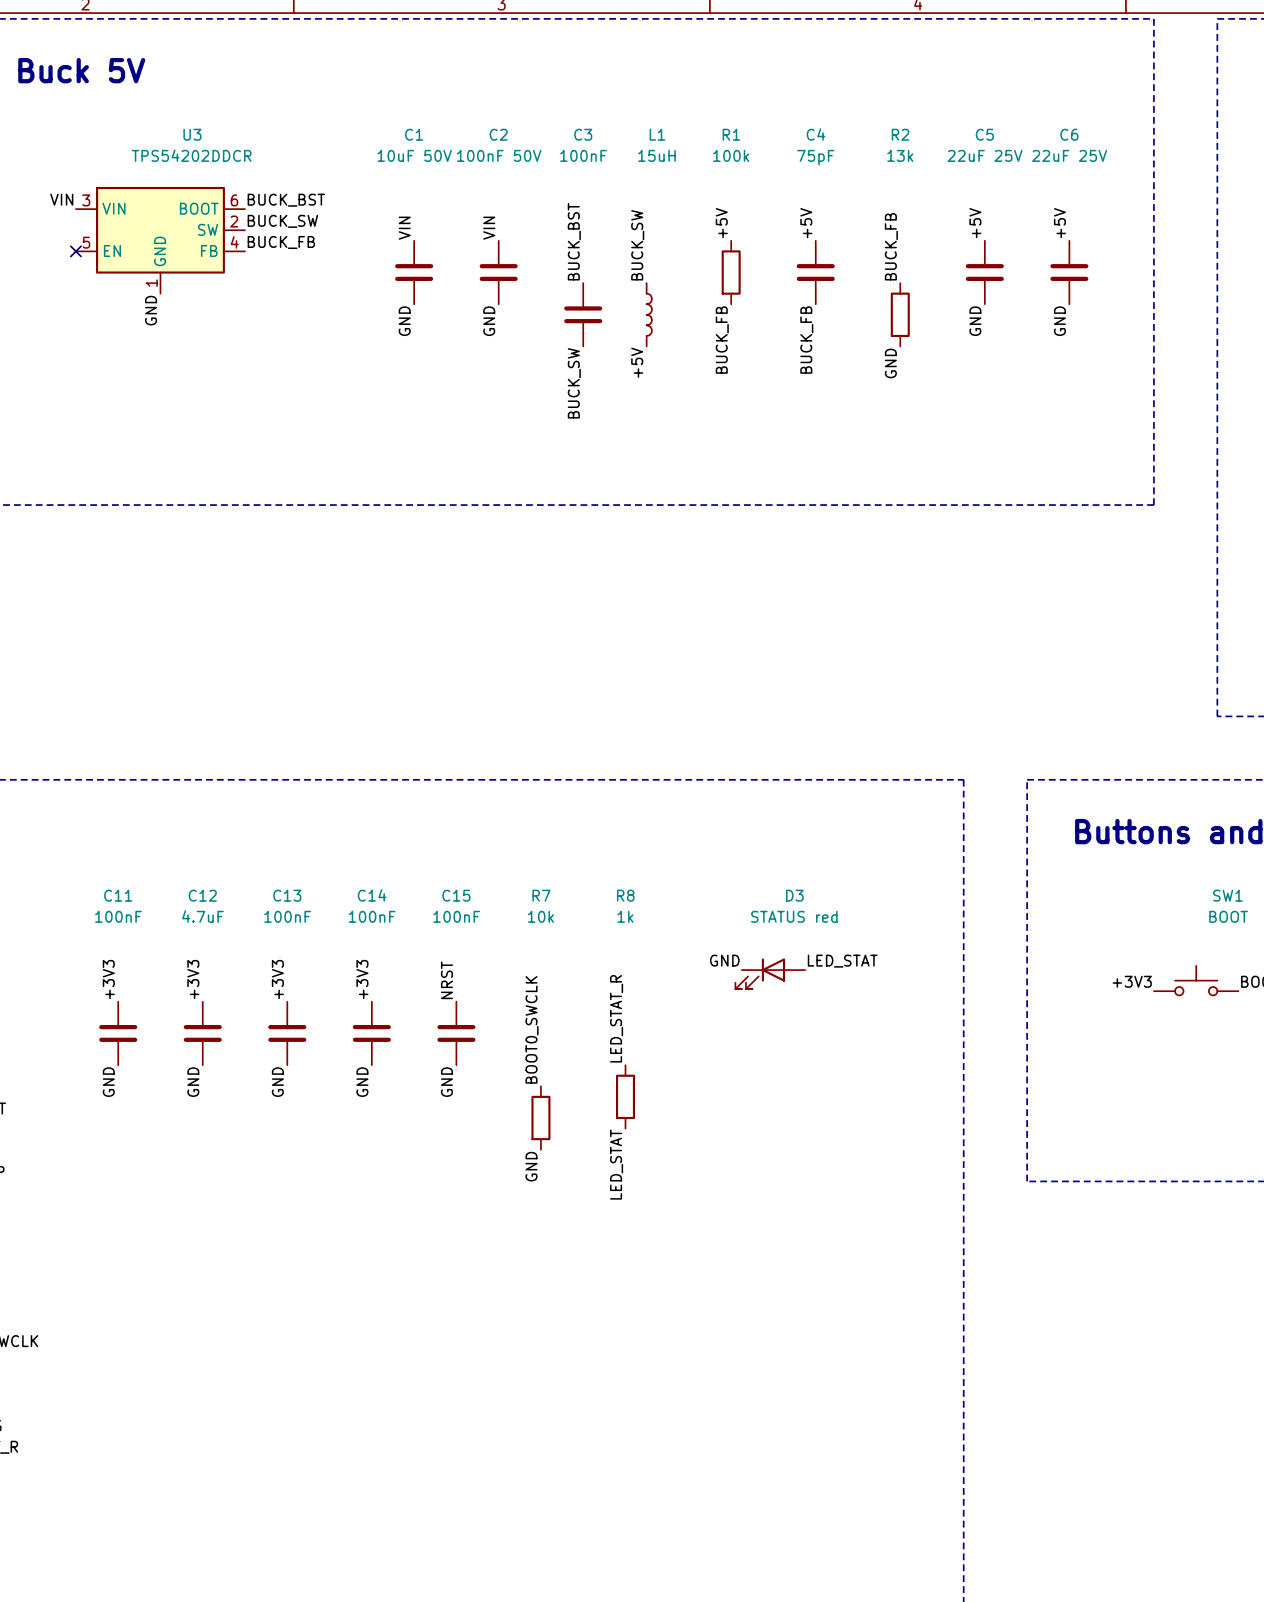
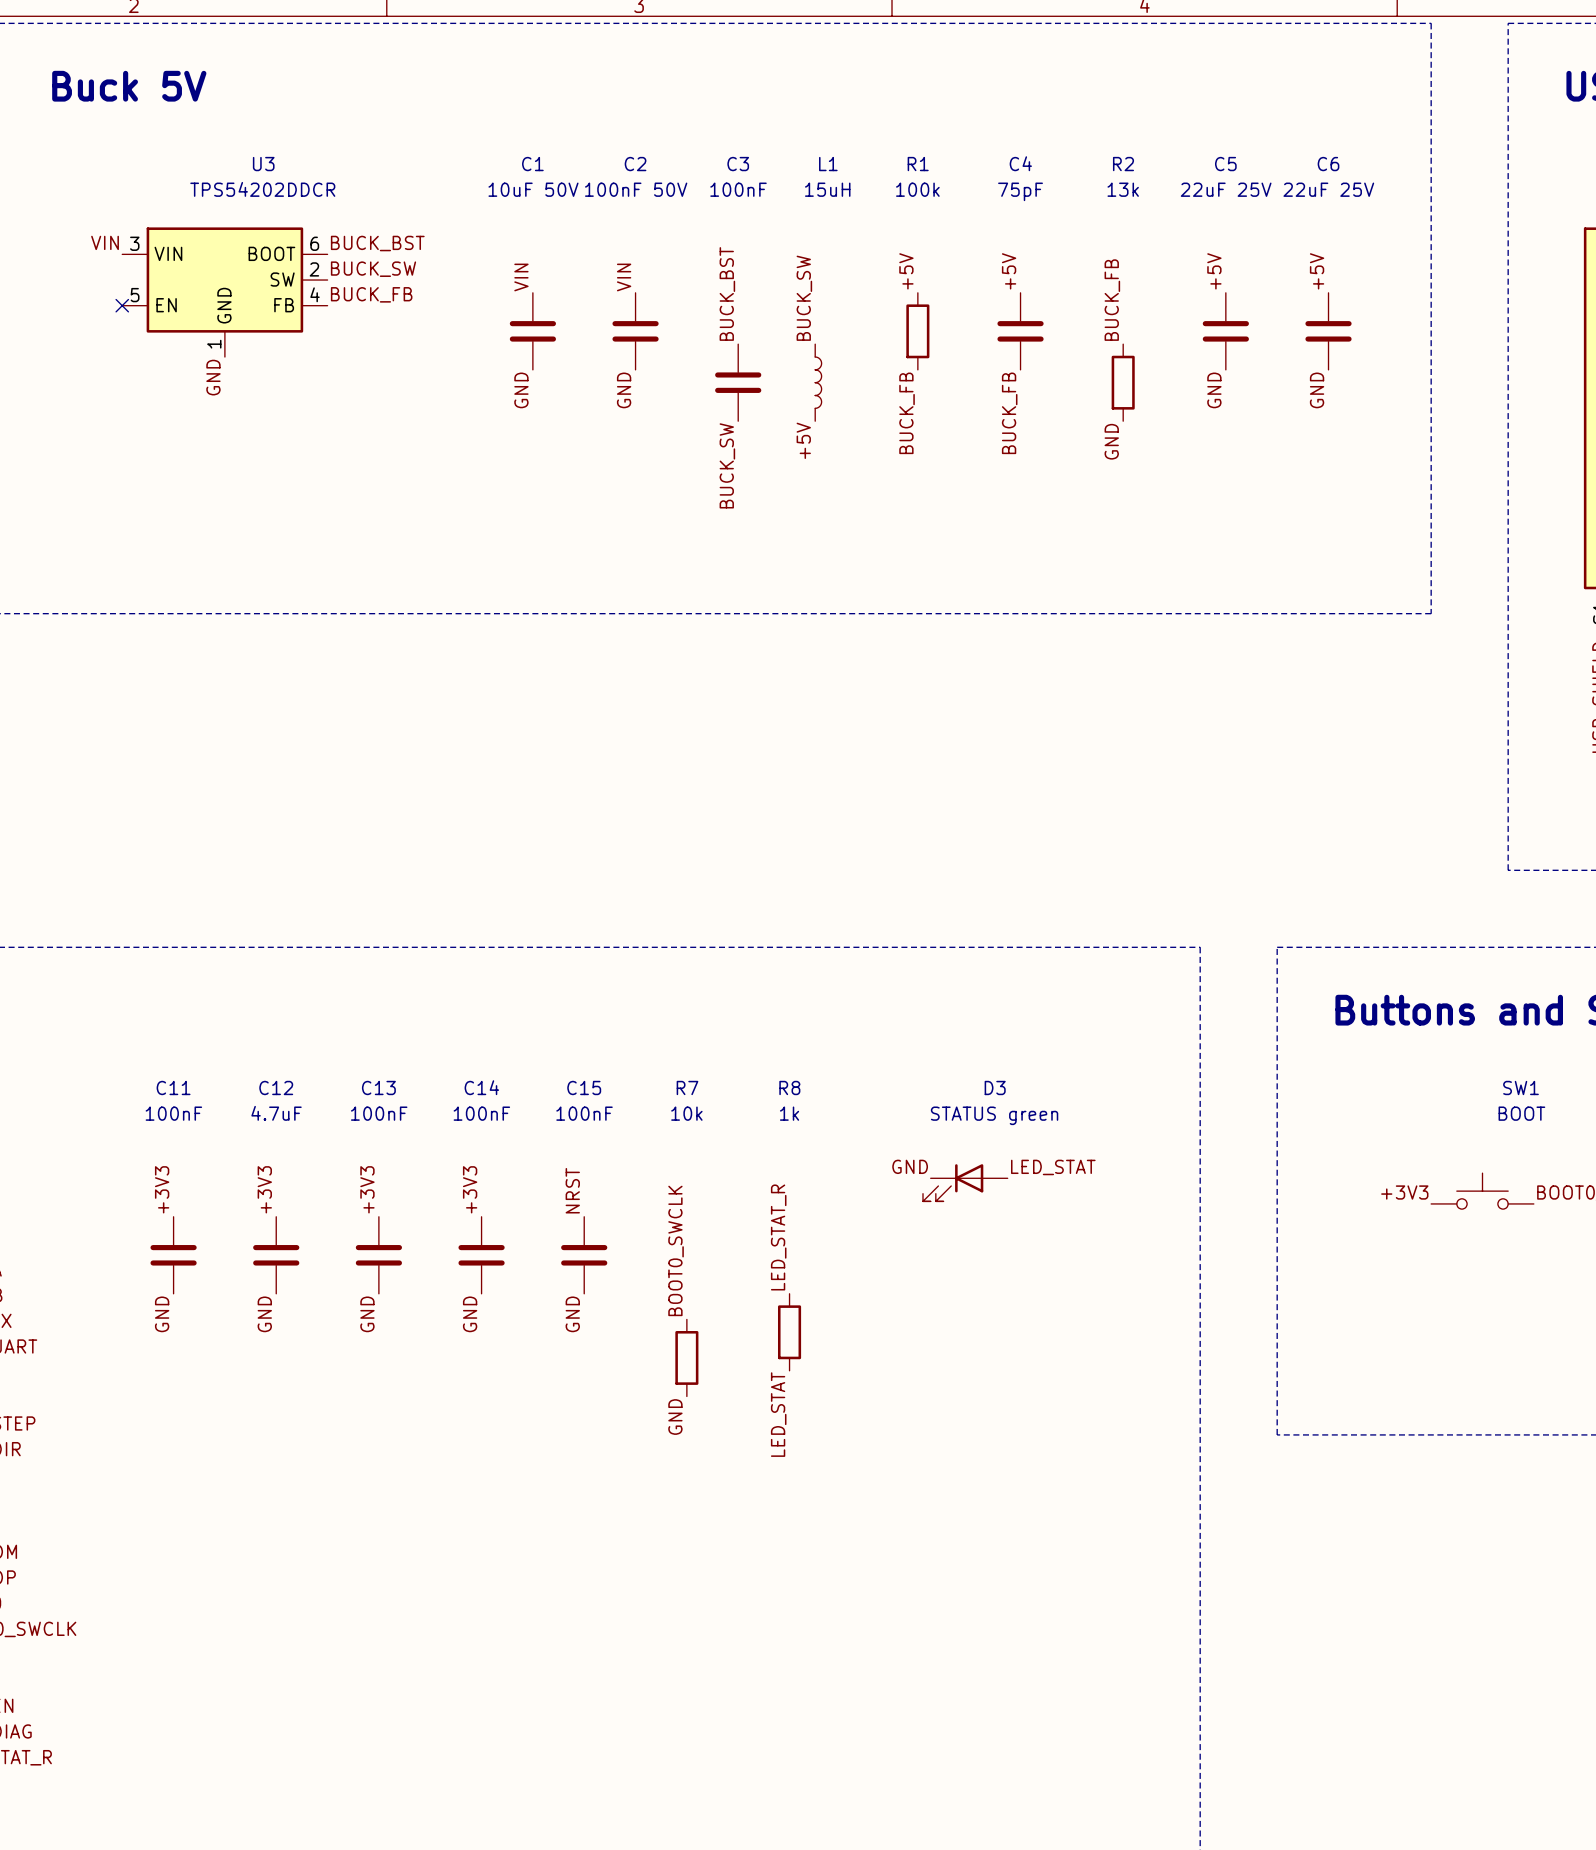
D3 value: STATUS red (794, 916) -> STATUS green (994, 1115)

